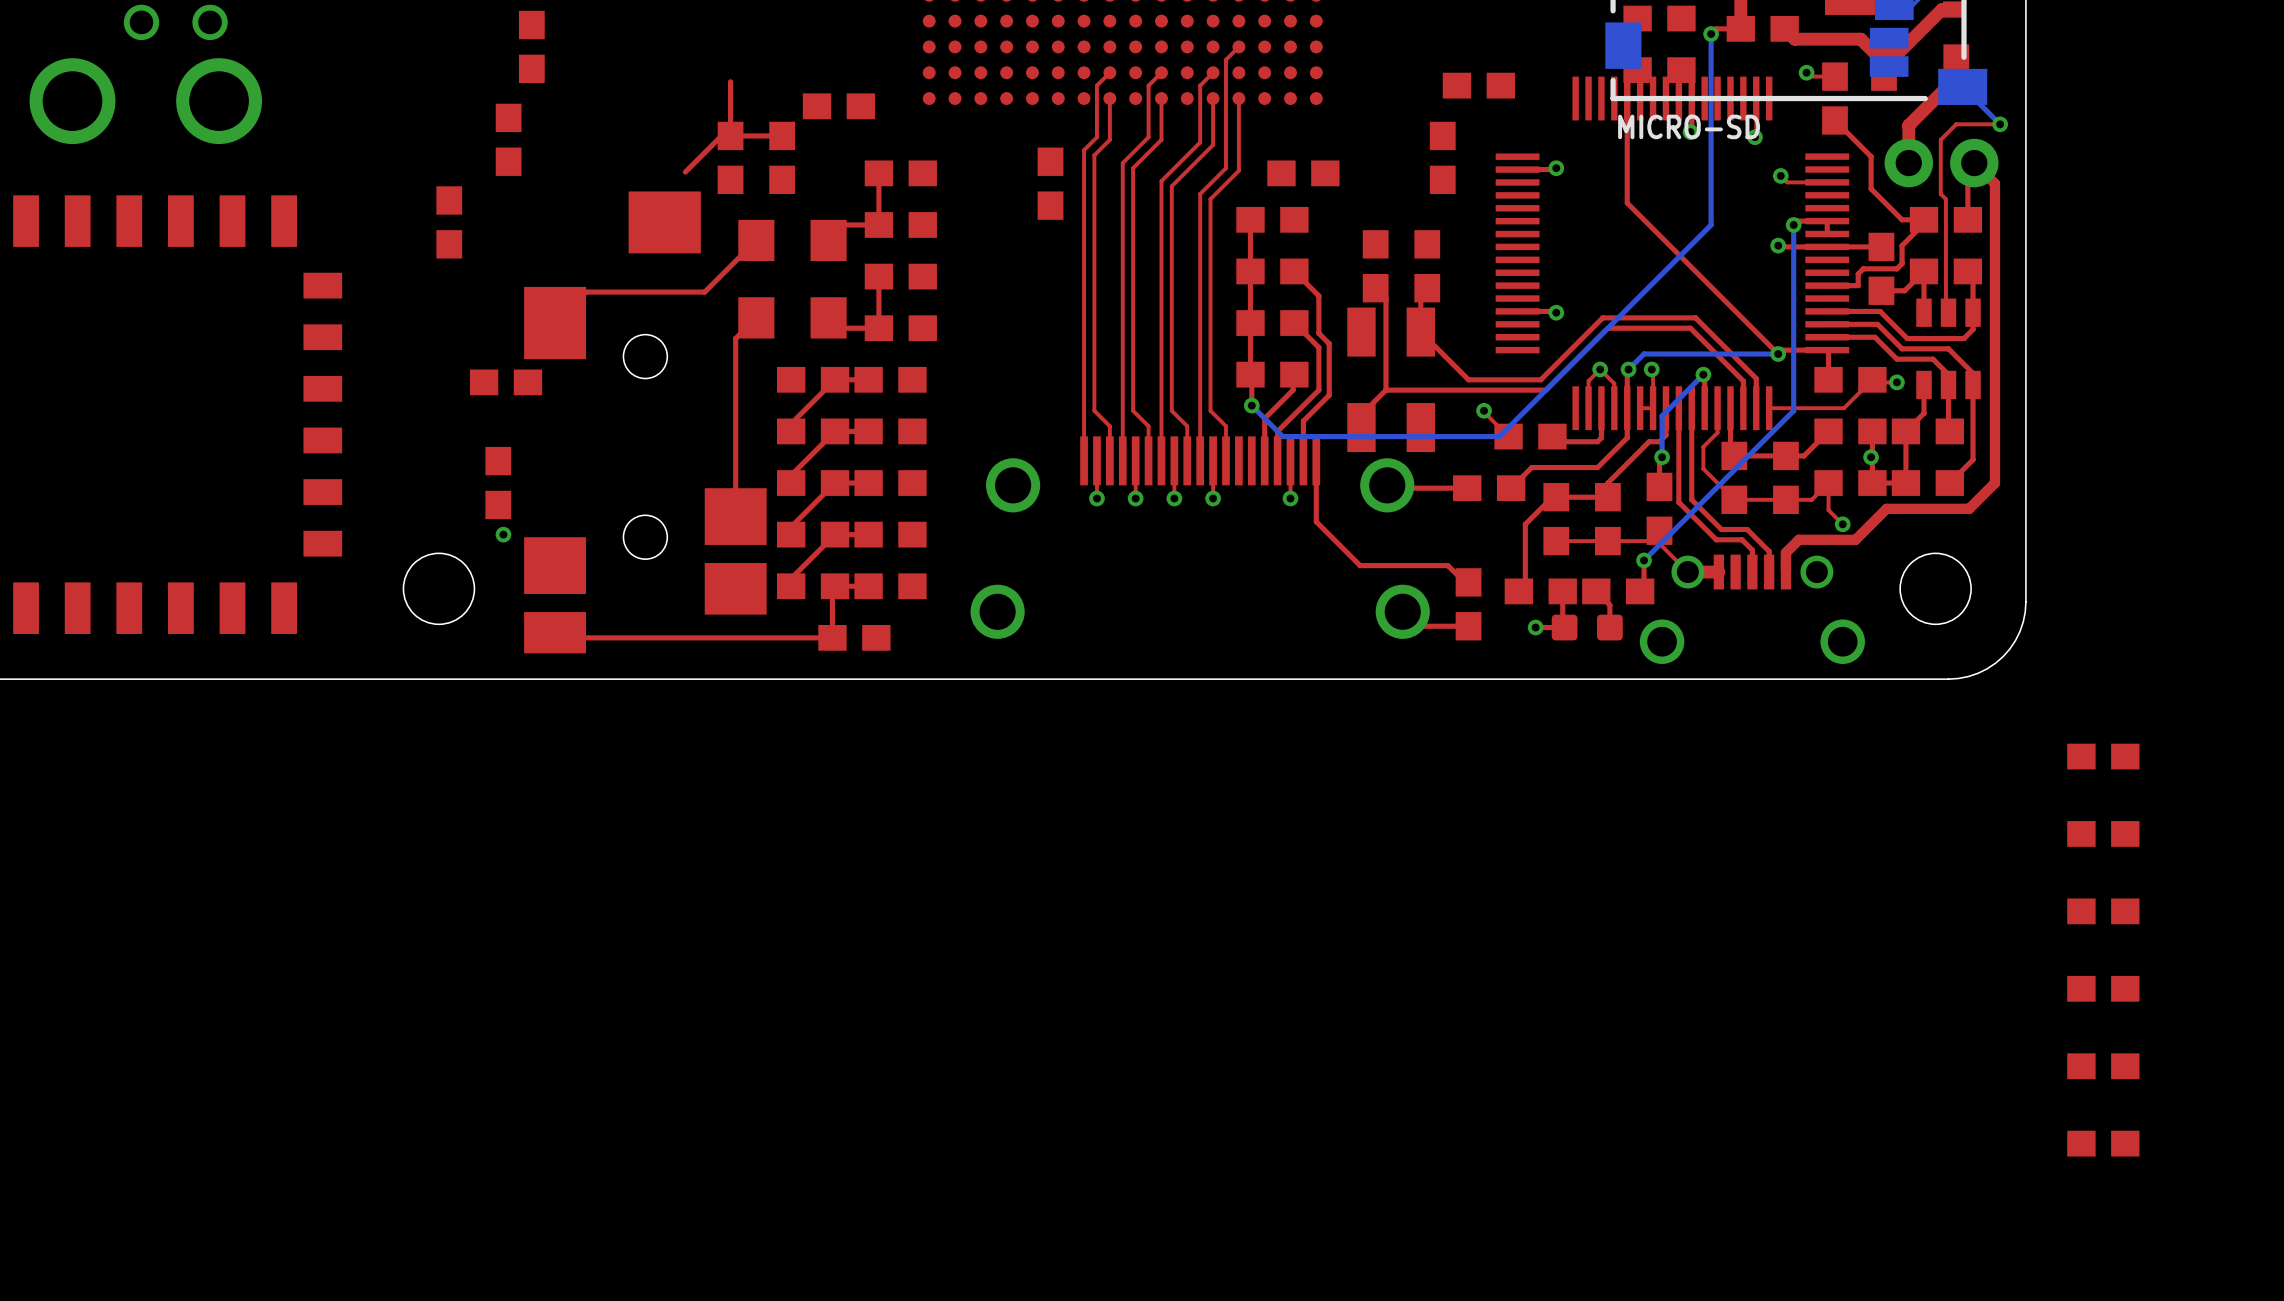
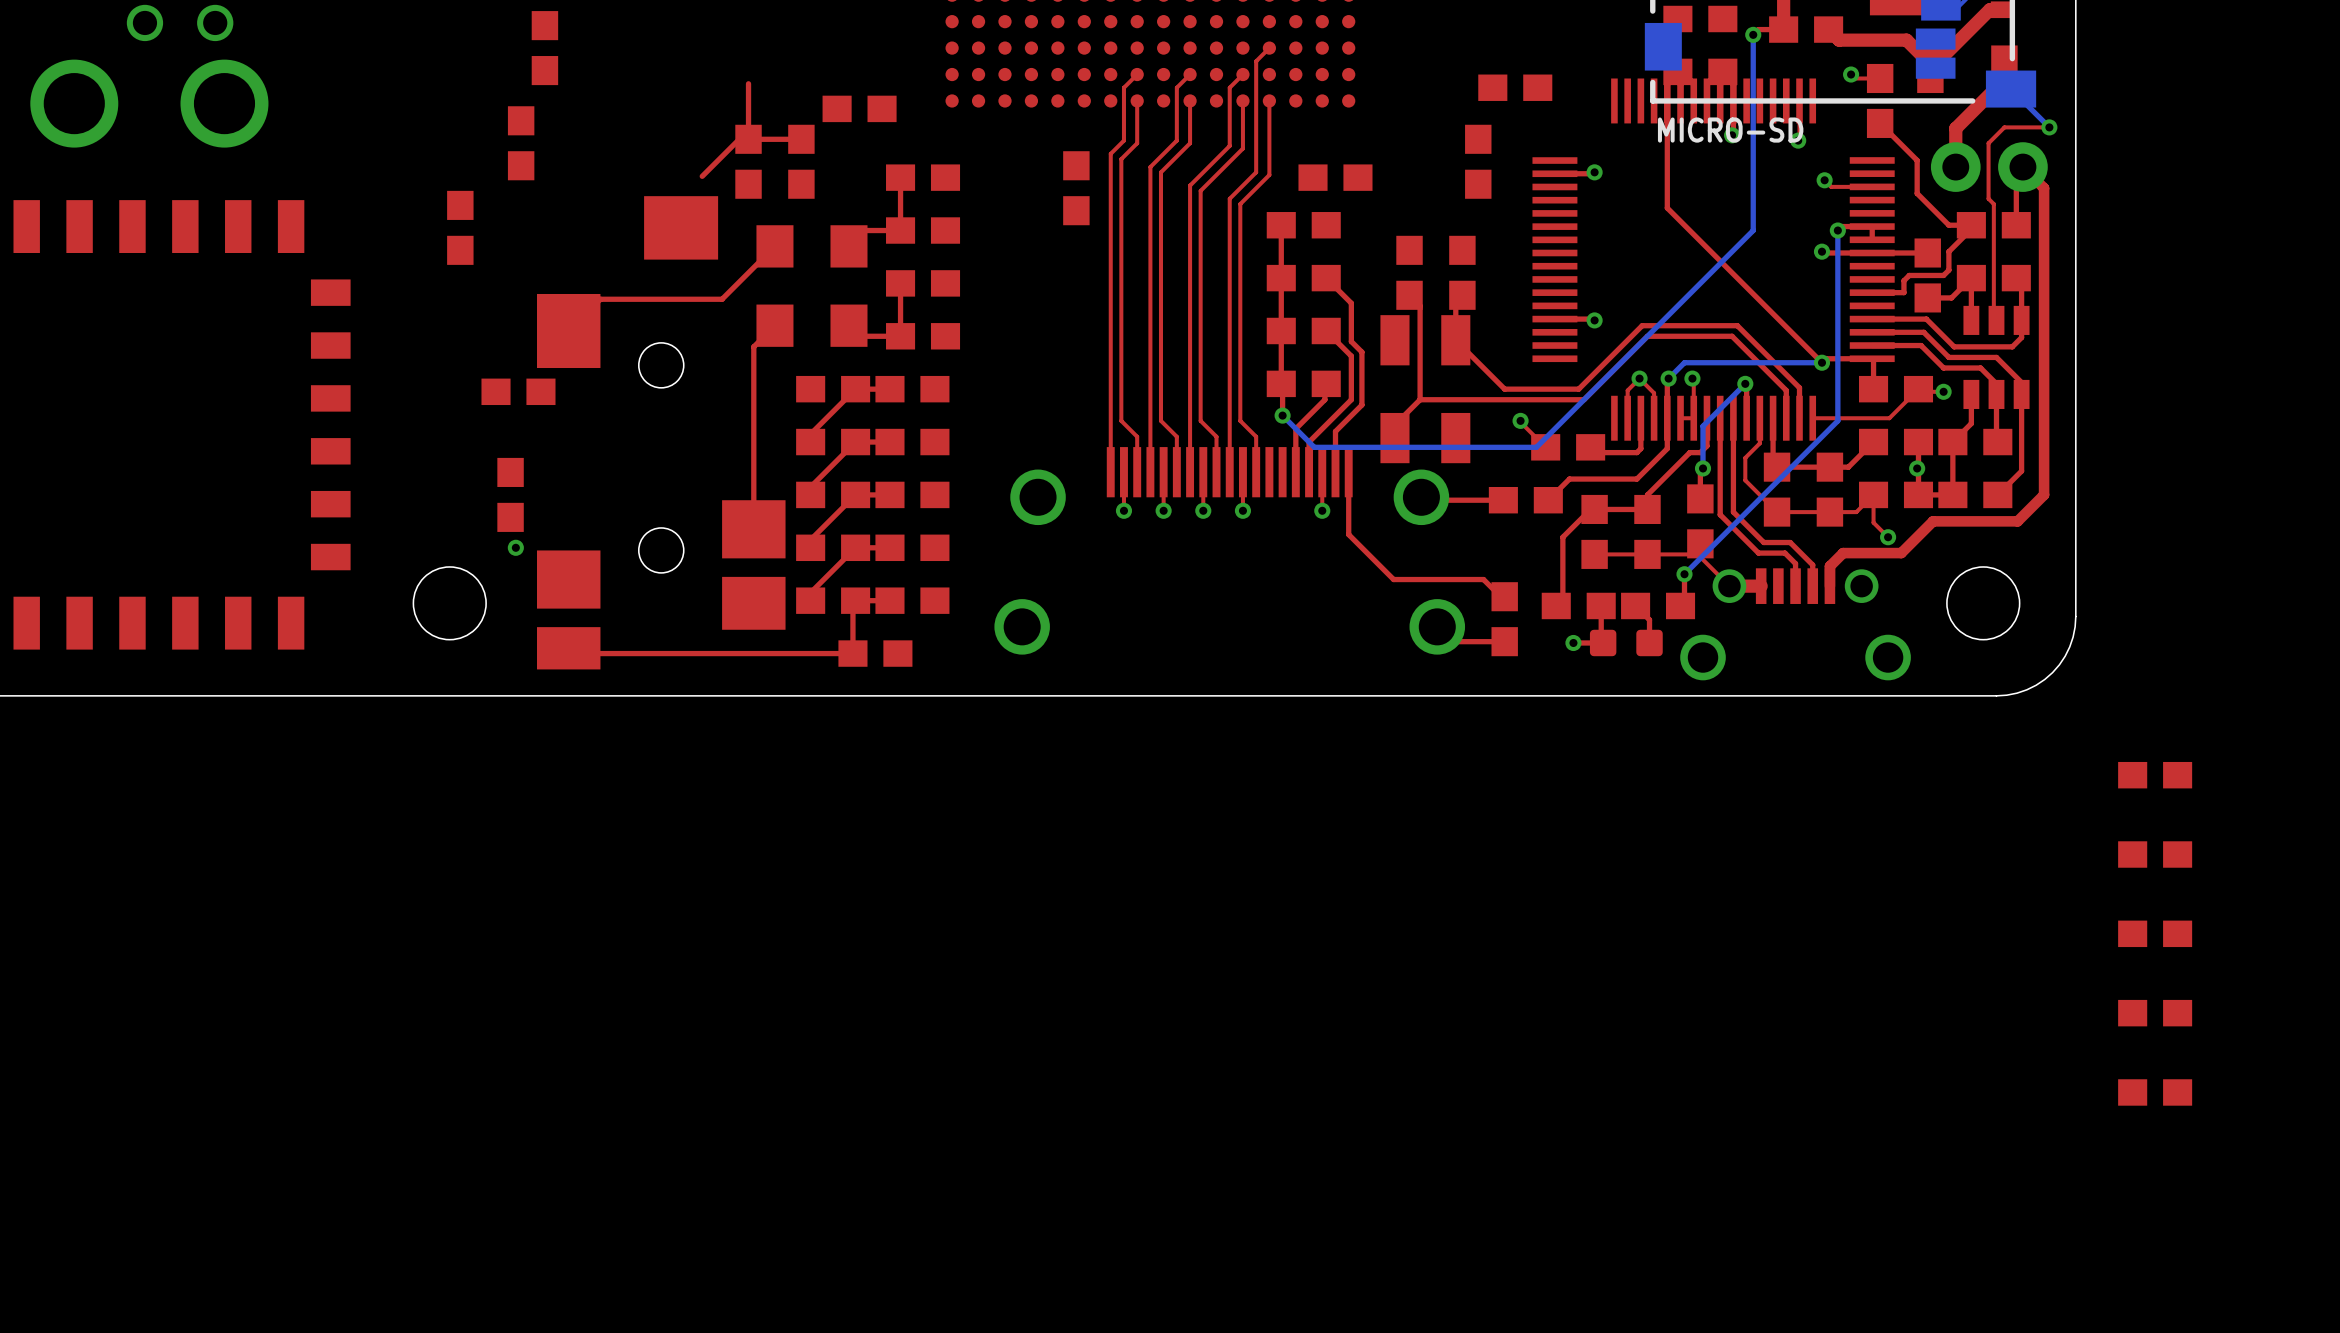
part: (2103, 1143) -> none

